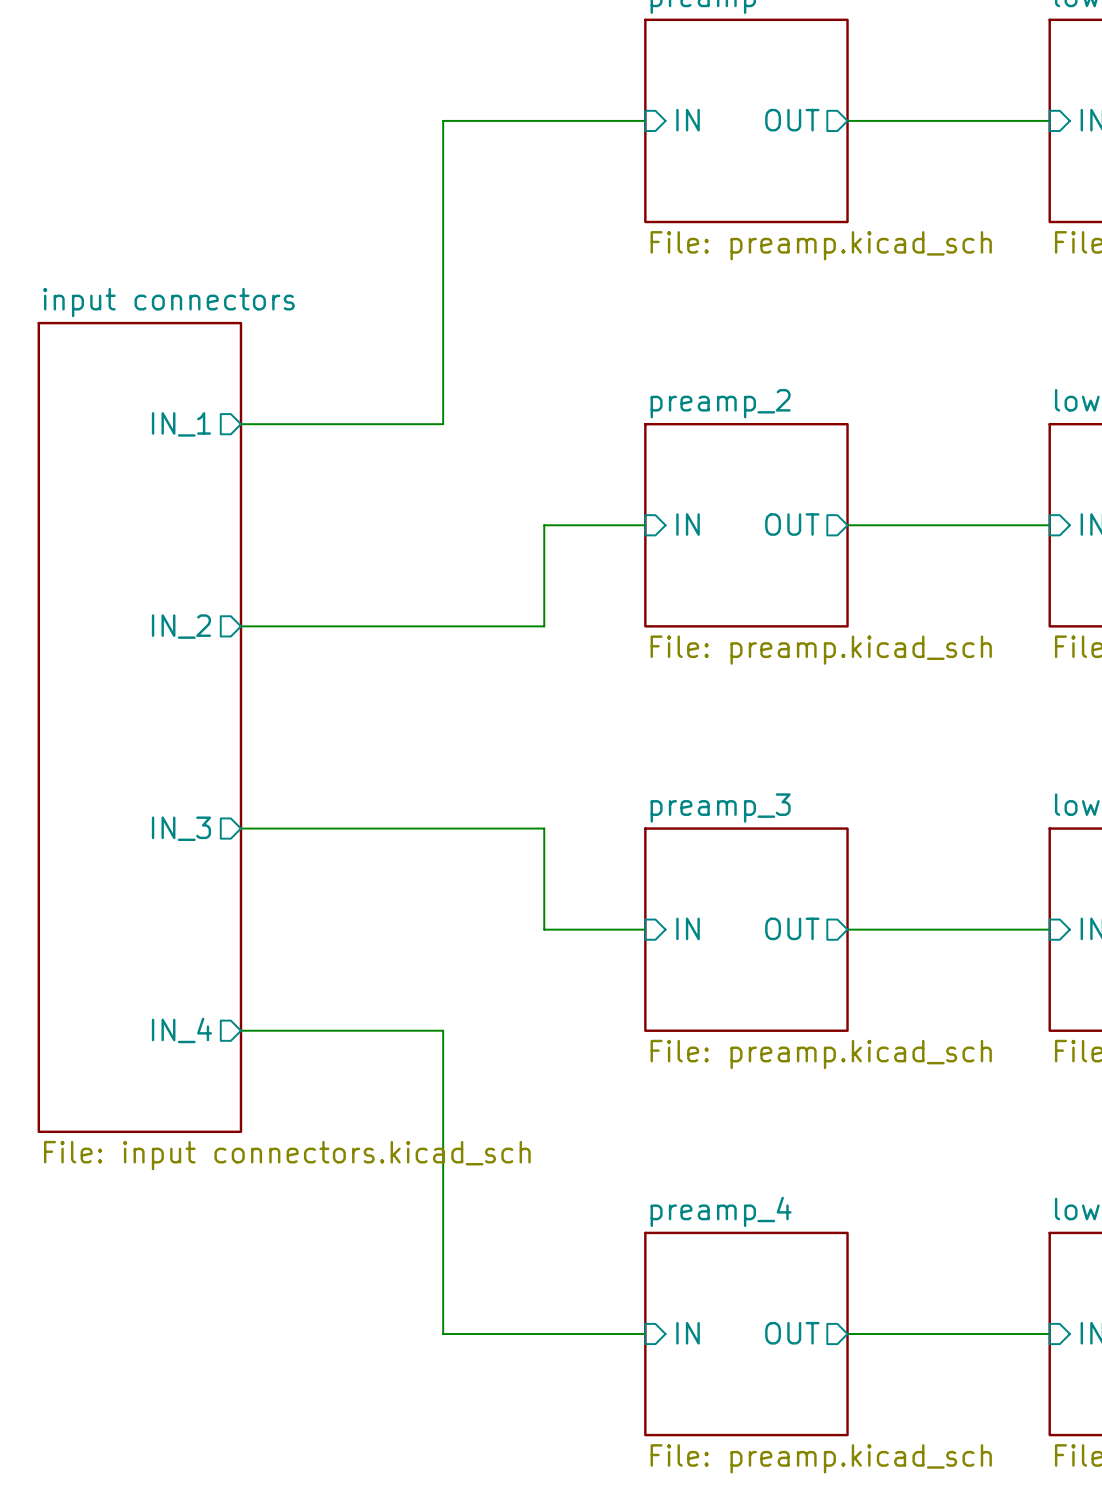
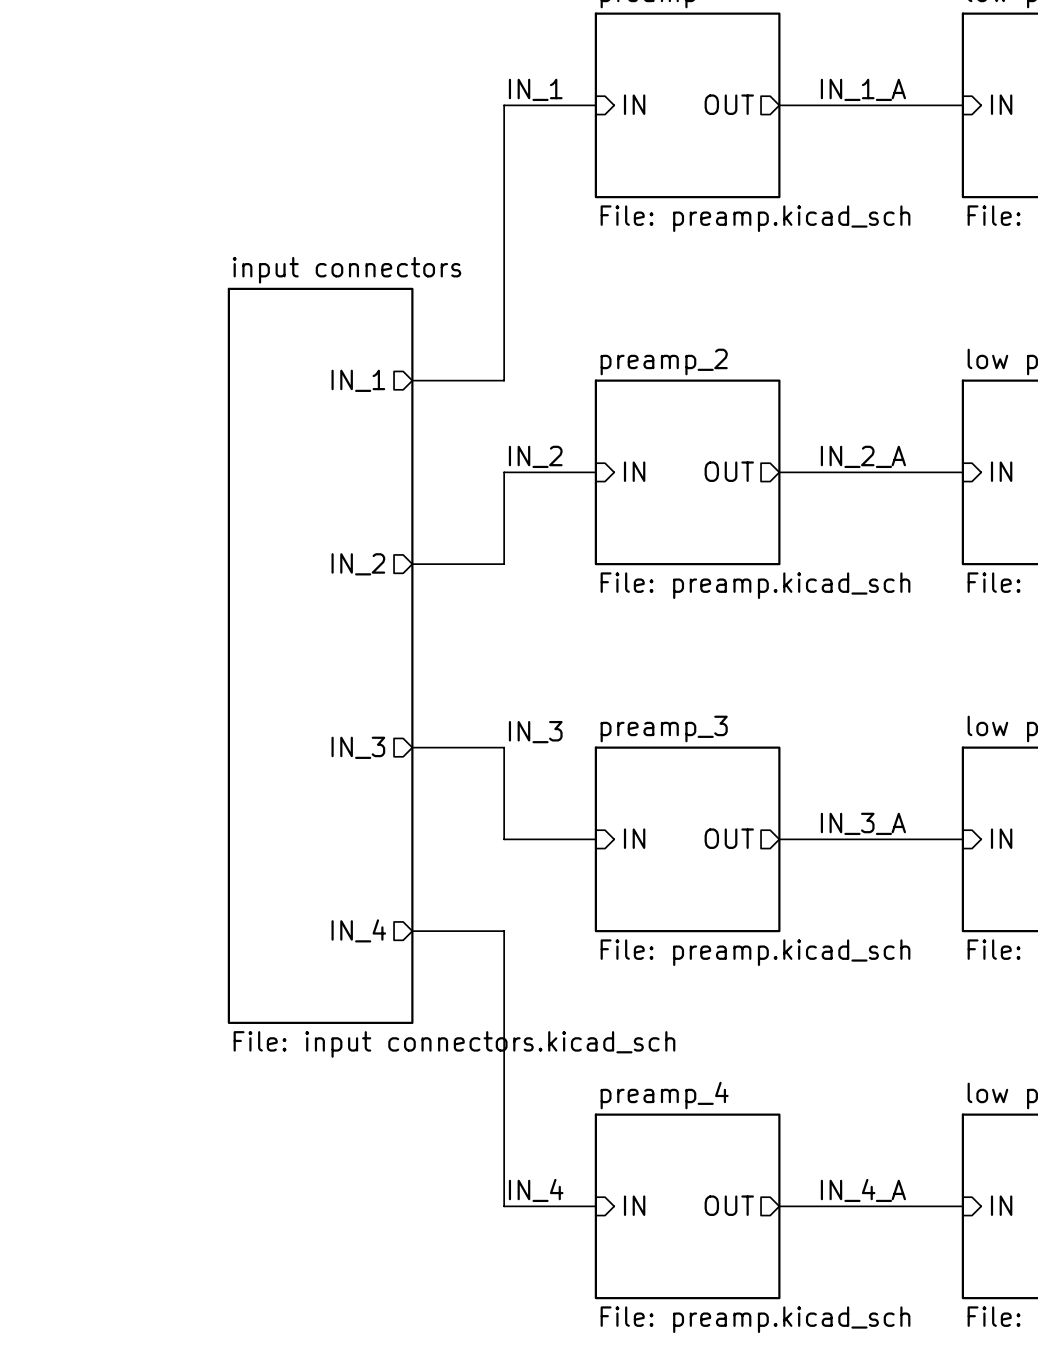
label: none -> IN_1 (535, 89)
label: none -> IN_1_A (863, 89)
wire: (544, 120) (443, 120) (443, 424) (240, 424) -> (504, 105) (504, 380) (412, 380)
sheet pin position: IN_1 (181, 424) -> IN_1 (358, 380)
label: none -> IN_2 (535, 456)
label: none -> IN_2_A (863, 456)
sheet pin position: IN_2 (181, 626) -> IN_2 (358, 564)
wire: (240, 626) (443, 626) -> none
sheet input connectors position: (139, 727) -> (320, 655)
label: none -> IN_3 (535, 732)
sheet pin position: IN_3 (181, 828) -> IN_3 (358, 747)
wire: (240, 828) (443, 828) -> none
label: none -> IN_3_A (863, 823)
sheet pin position: IN_4 (181, 1030) -> IN_4 (358, 930)
wire: (240, 1030) (443, 1030) (443, 1334) (544, 1334) -> (412, 931) (504, 931) (504, 1206)
label: none -> IN_4 (536, 1190)
label: none -> IN_4_A (863, 1190)

